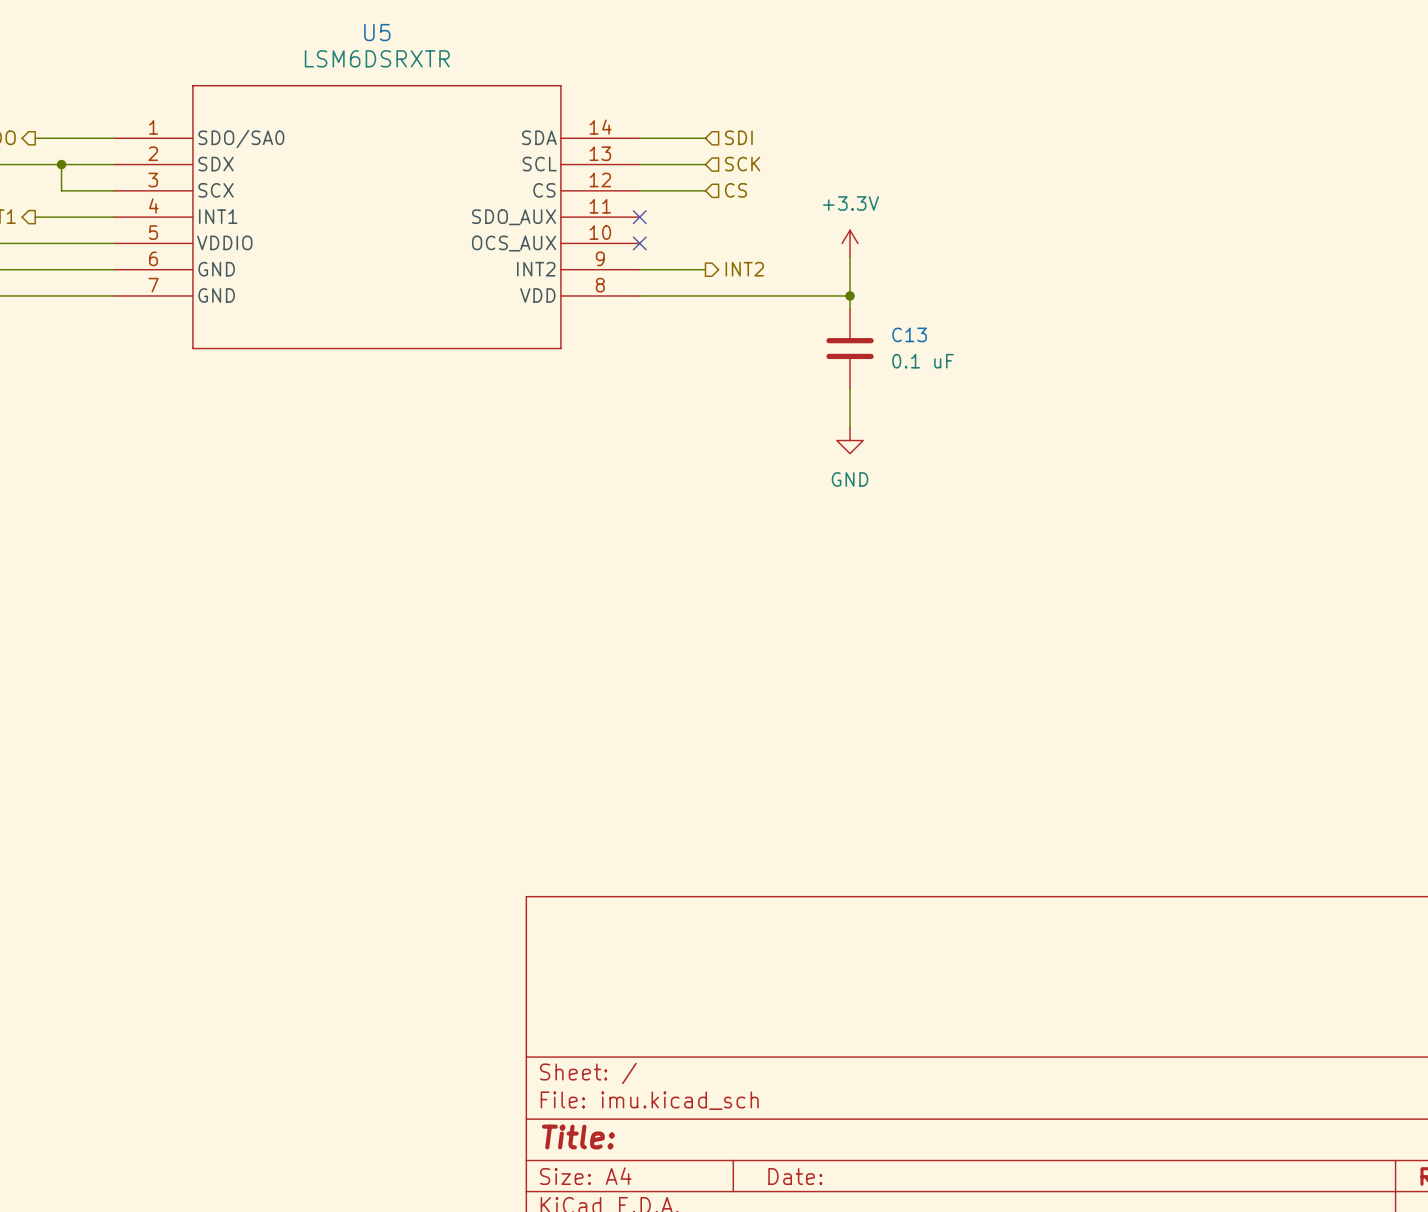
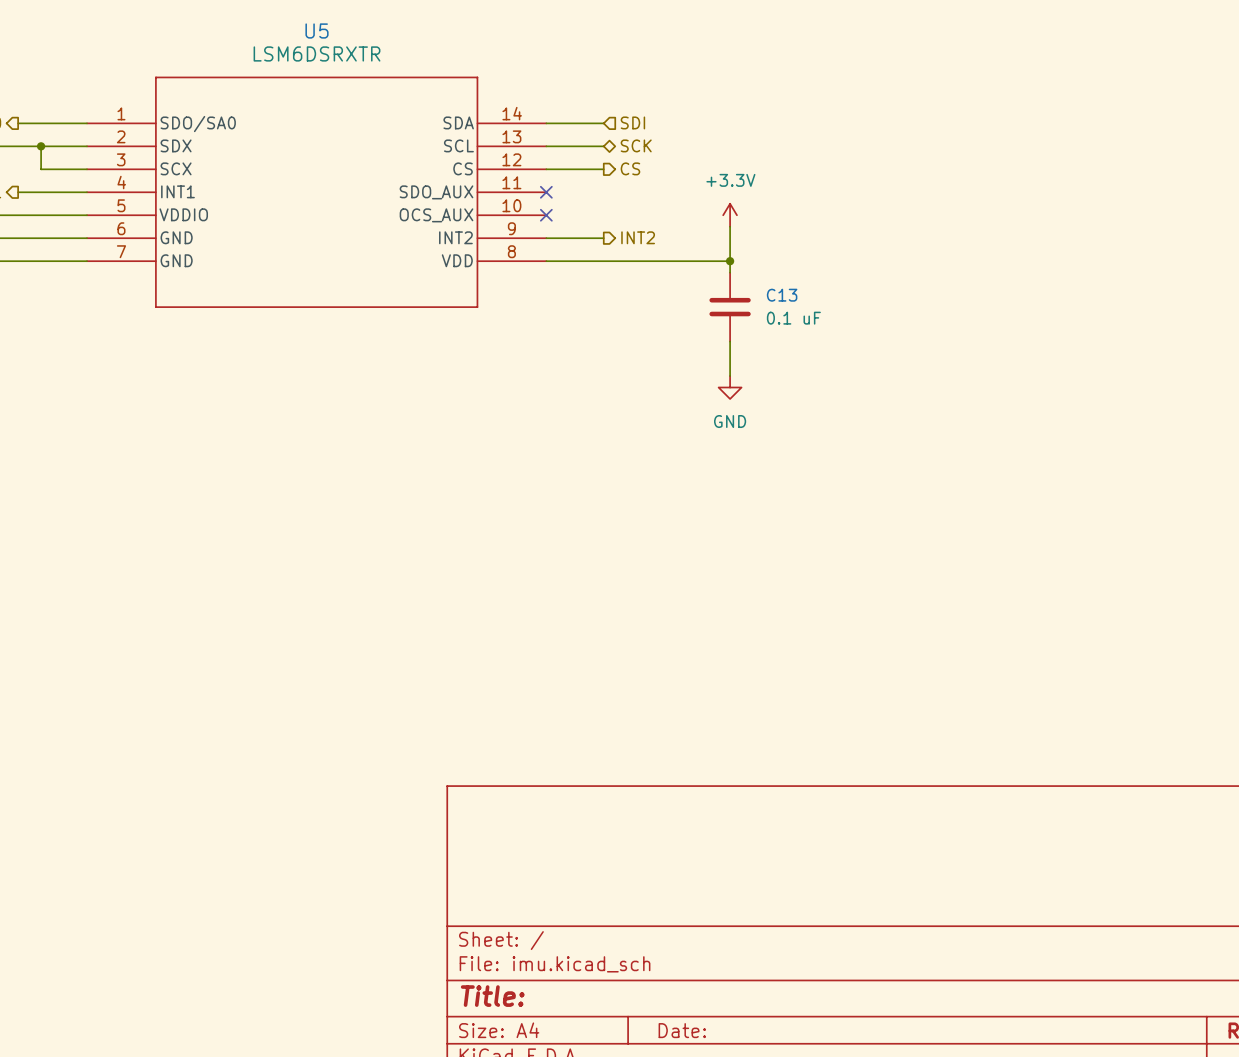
hierarchical label shape: input (742, 164) -> bidirectional (636, 145)
hierarchical label shape: input (736, 190) -> output (630, 168)

